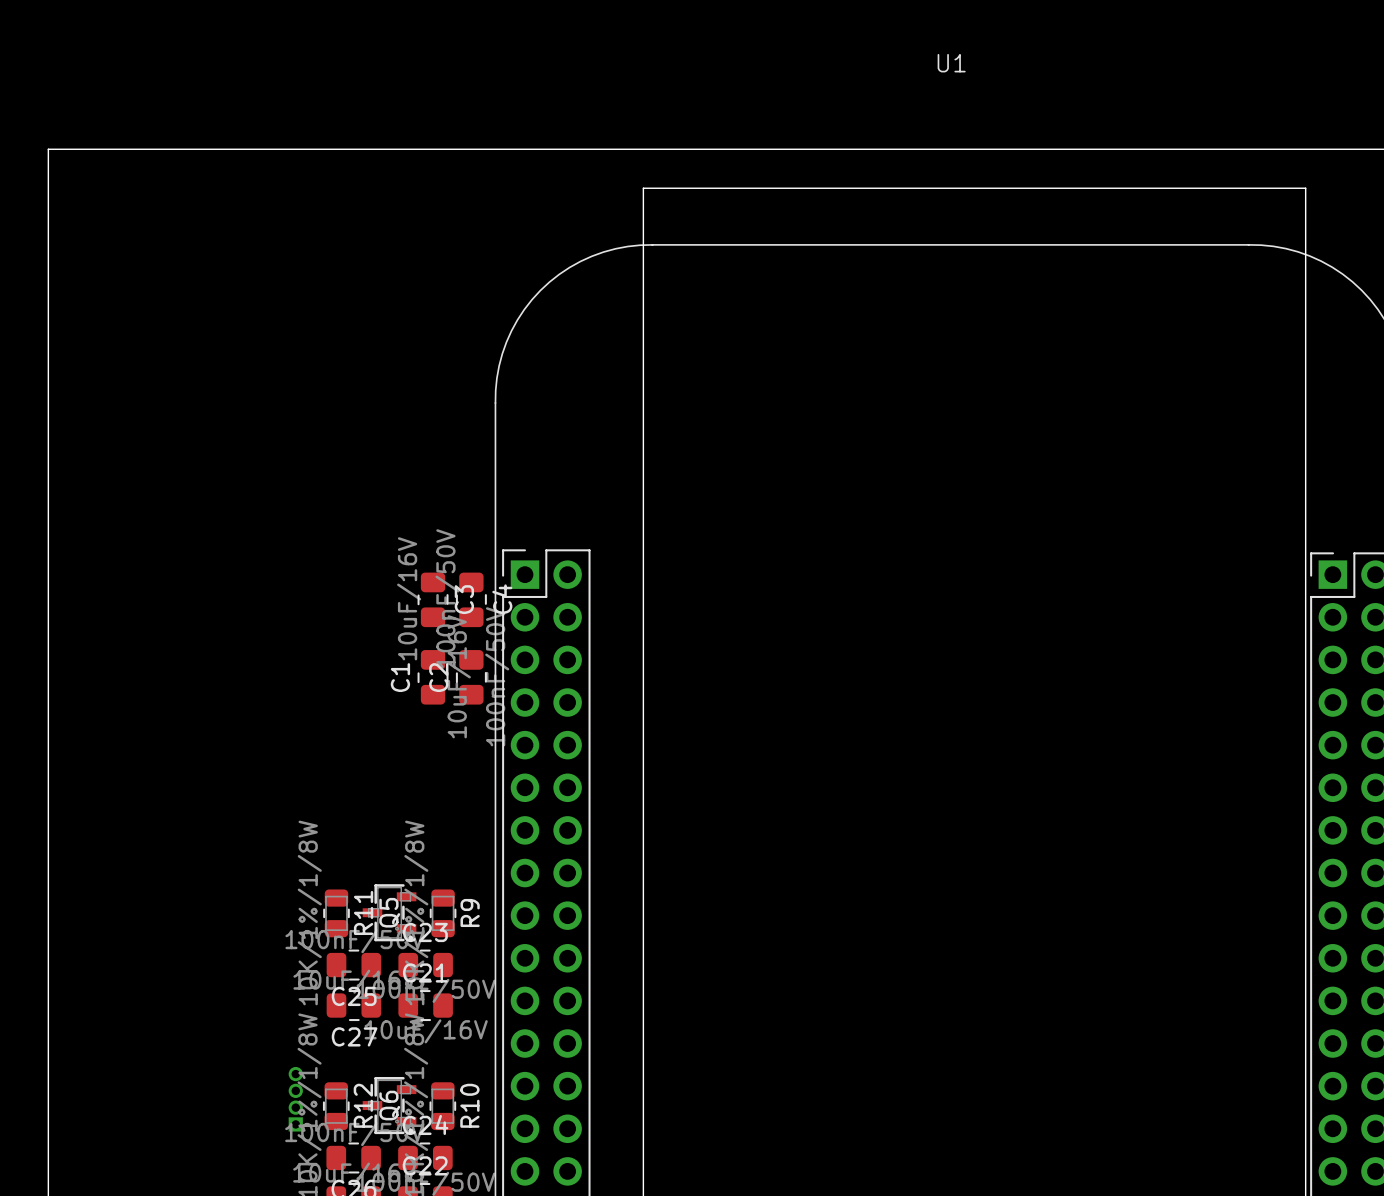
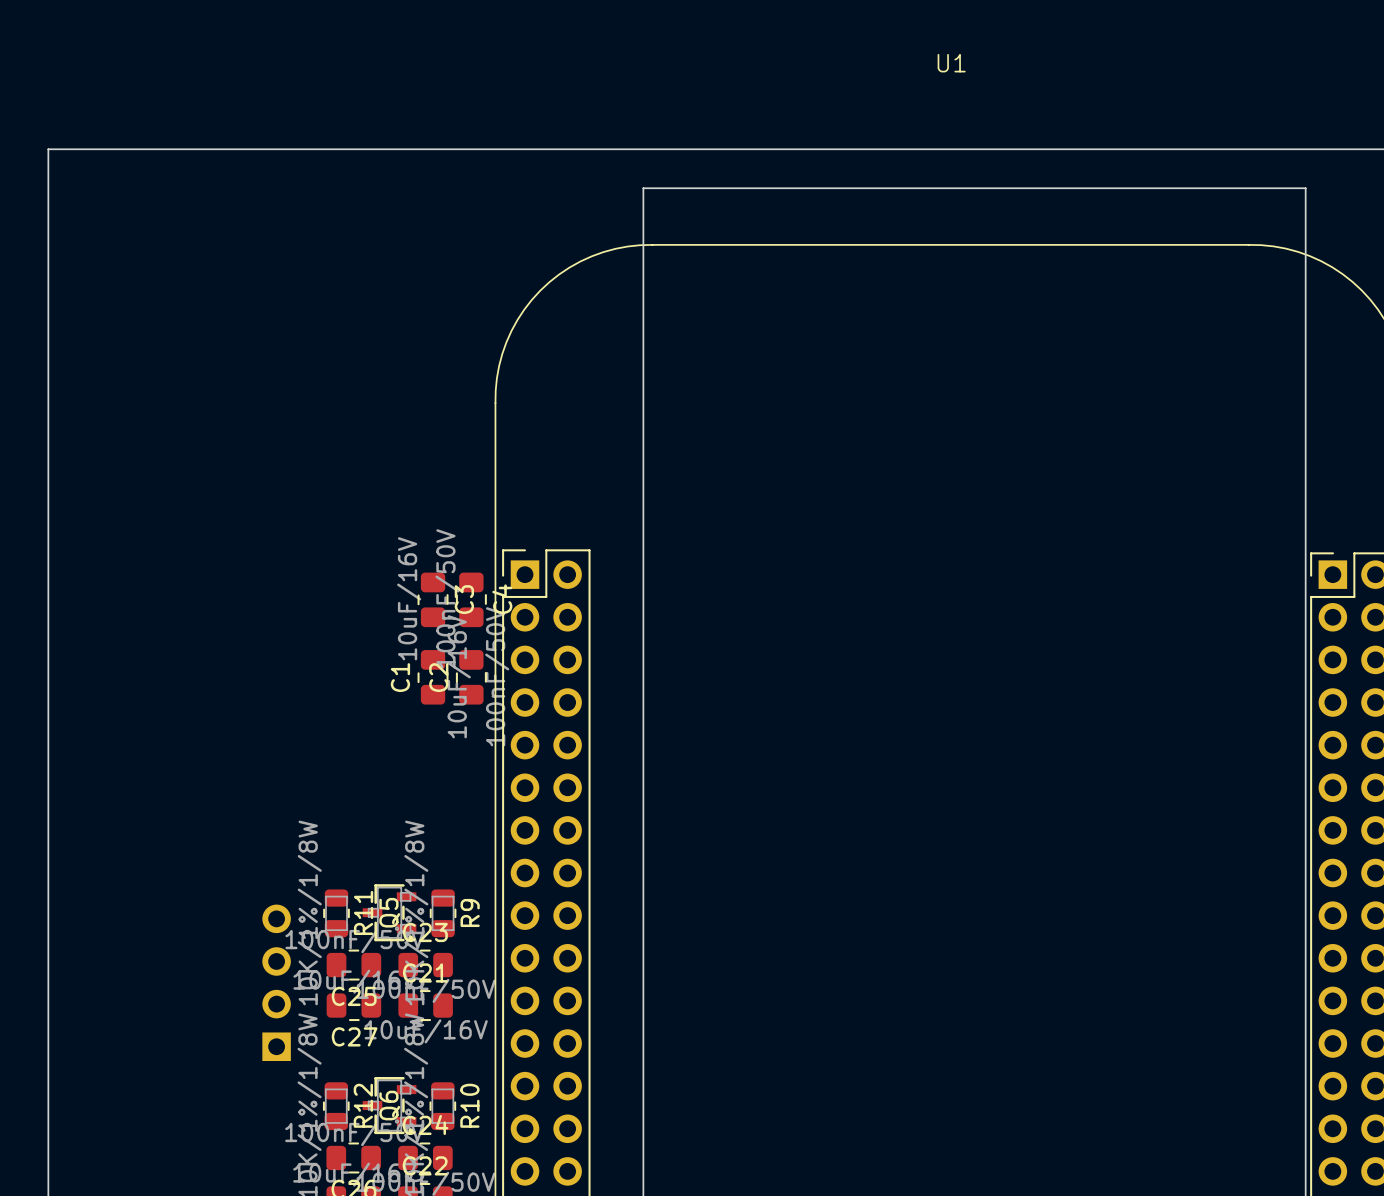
part: none -> (276, 982)
part: (295, 1099) -> none

